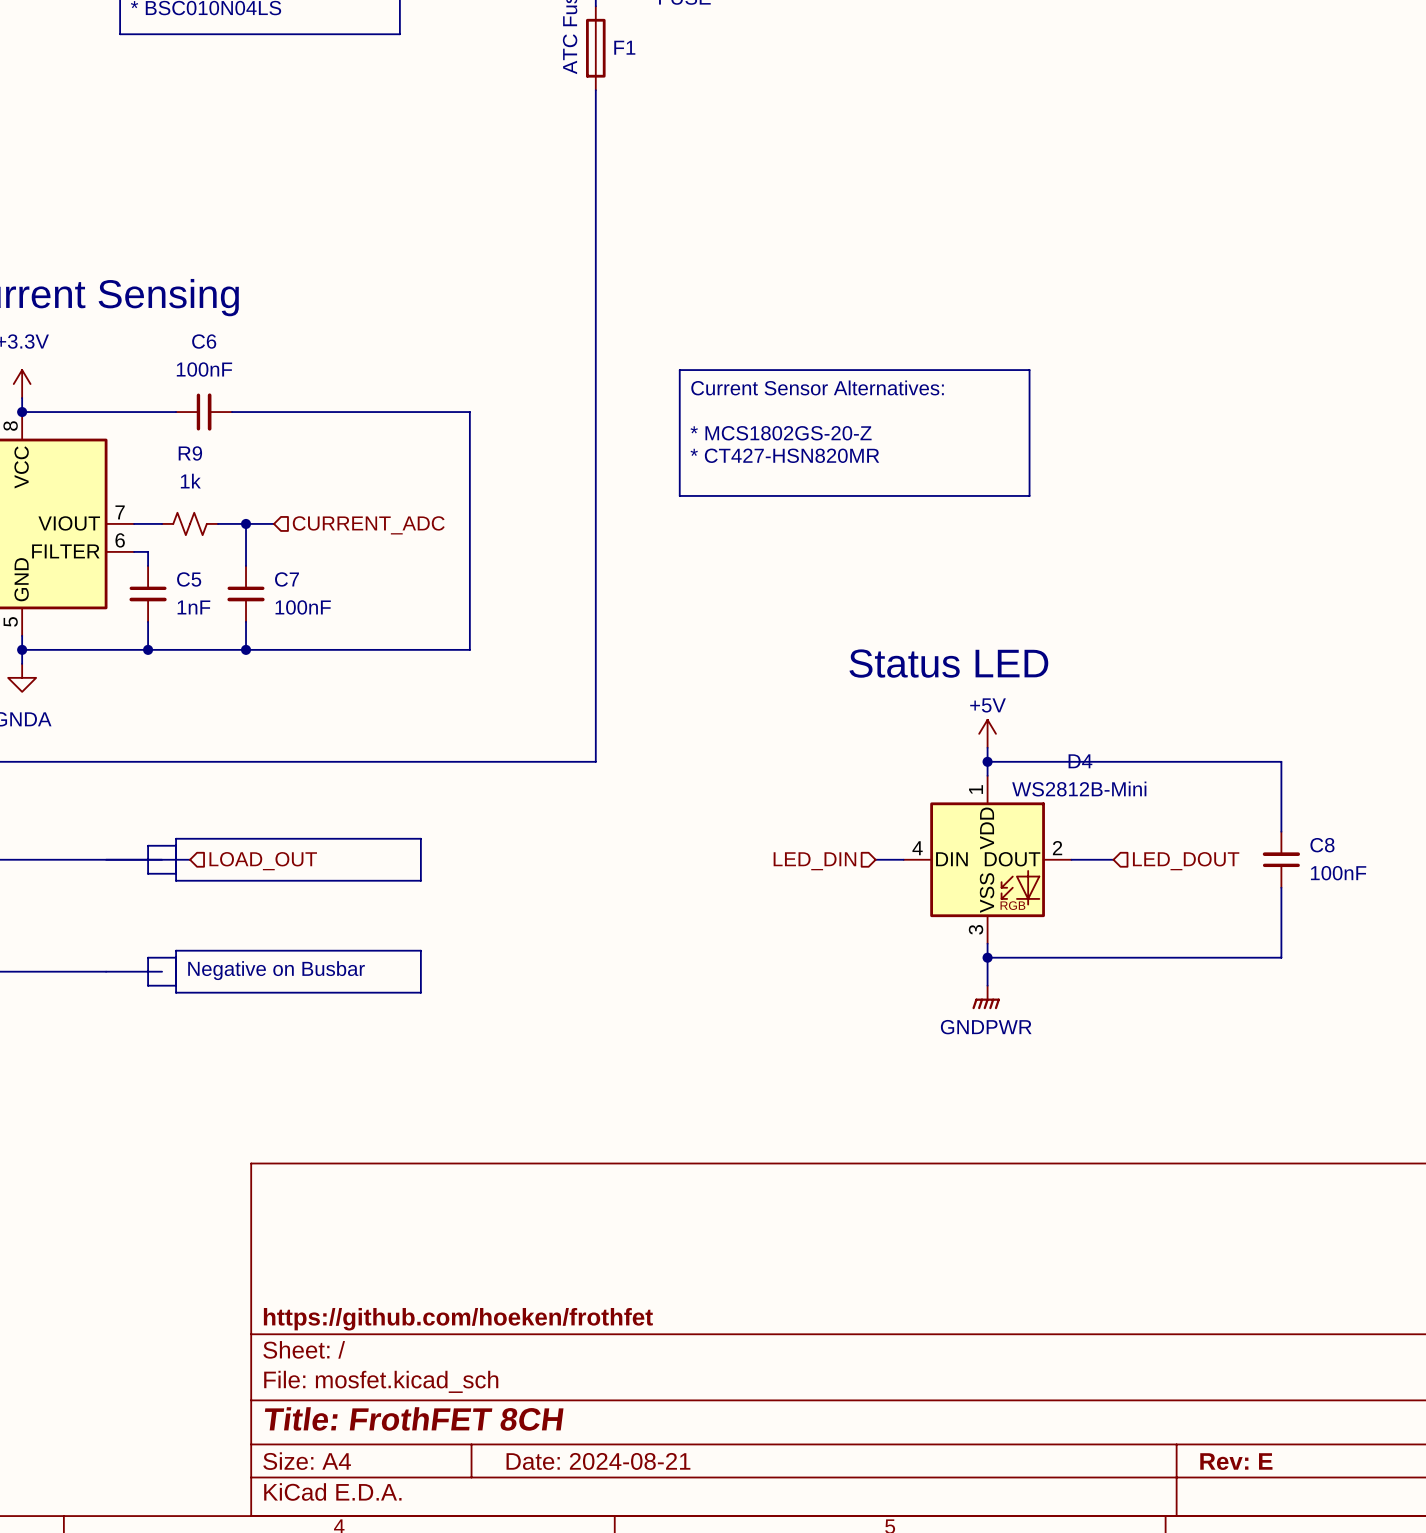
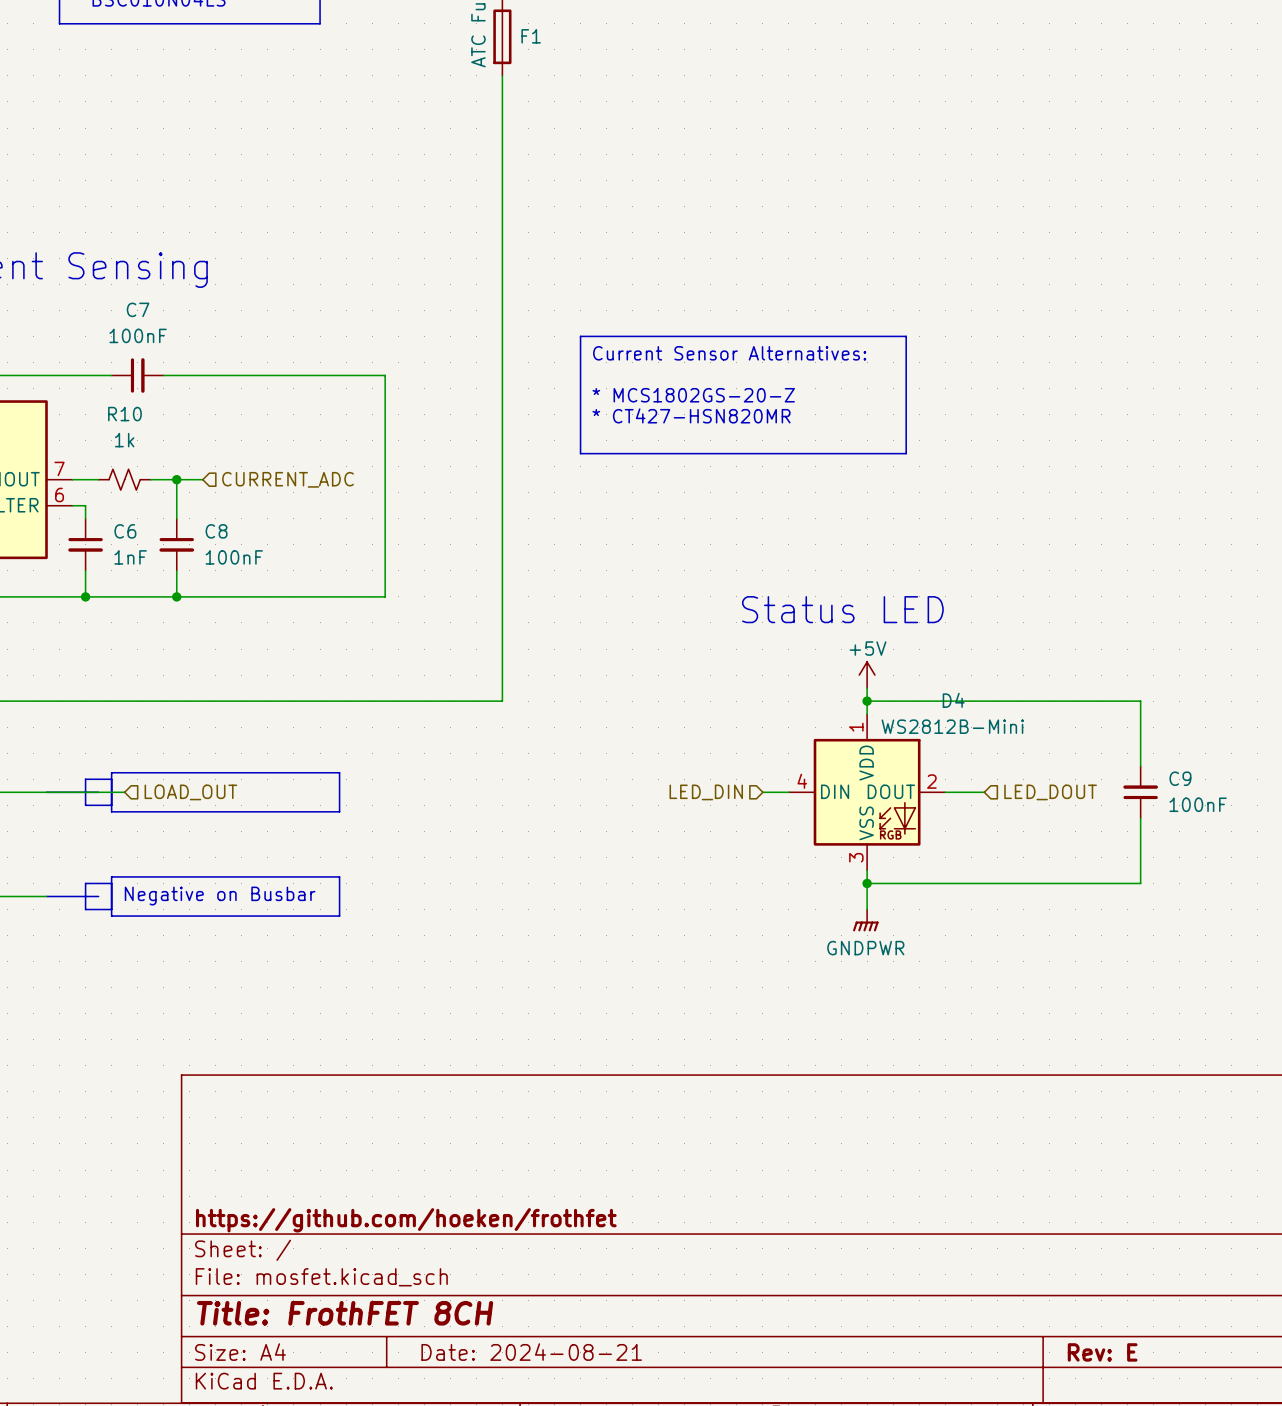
C6 name: C6 (204, 341) -> C7 (138, 309)
R9 name: R9 (190, 453) -> R10 (124, 414)
C5 name: C5 (189, 579) -> C6 (125, 531)
C7 name: C7 (287, 579) -> C8 (216, 531)
C8 name: C8 (1322, 845) -> C9 (1180, 778)

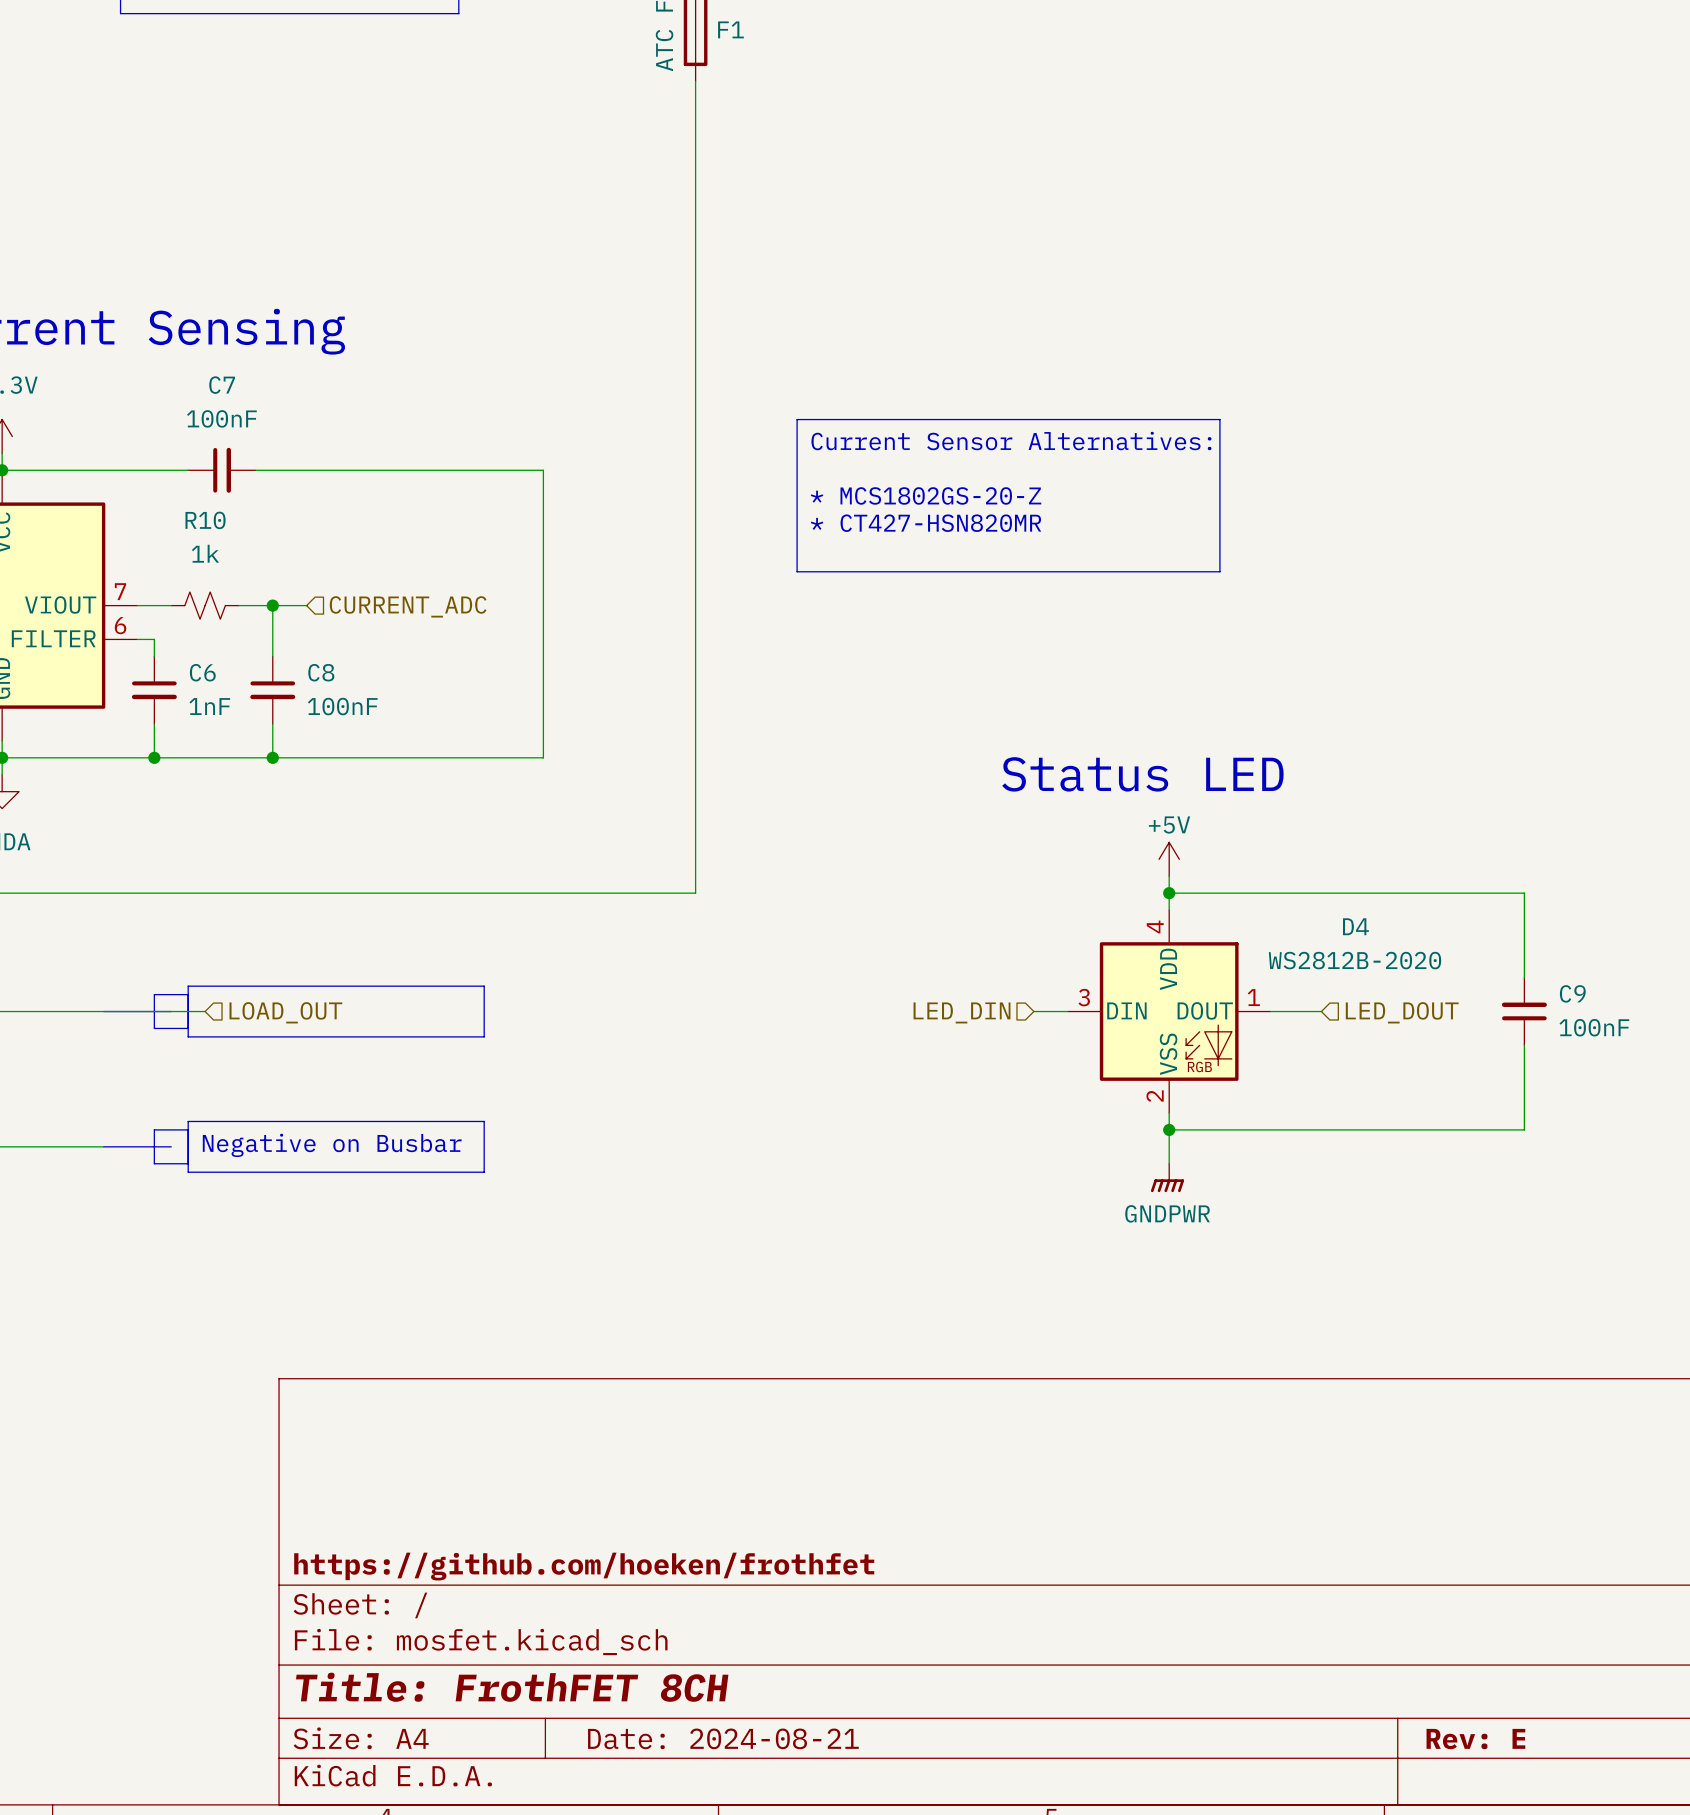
D4 name position: D4 (953, 700) -> D4 (1355, 926)
D4 value: WS2812B-Mini (952, 726) -> WS2812B-2020 (1354, 960)
D4 pin number: 1 (856, 727) -> 4 (1155, 927)
D4 pin number: 4 (802, 781) -> 3 (1084, 997)
D4 pin number: 2 (931, 781) -> 1 (1253, 997)
D4 pin number: 3 (856, 857) -> 2 (1155, 1096)

